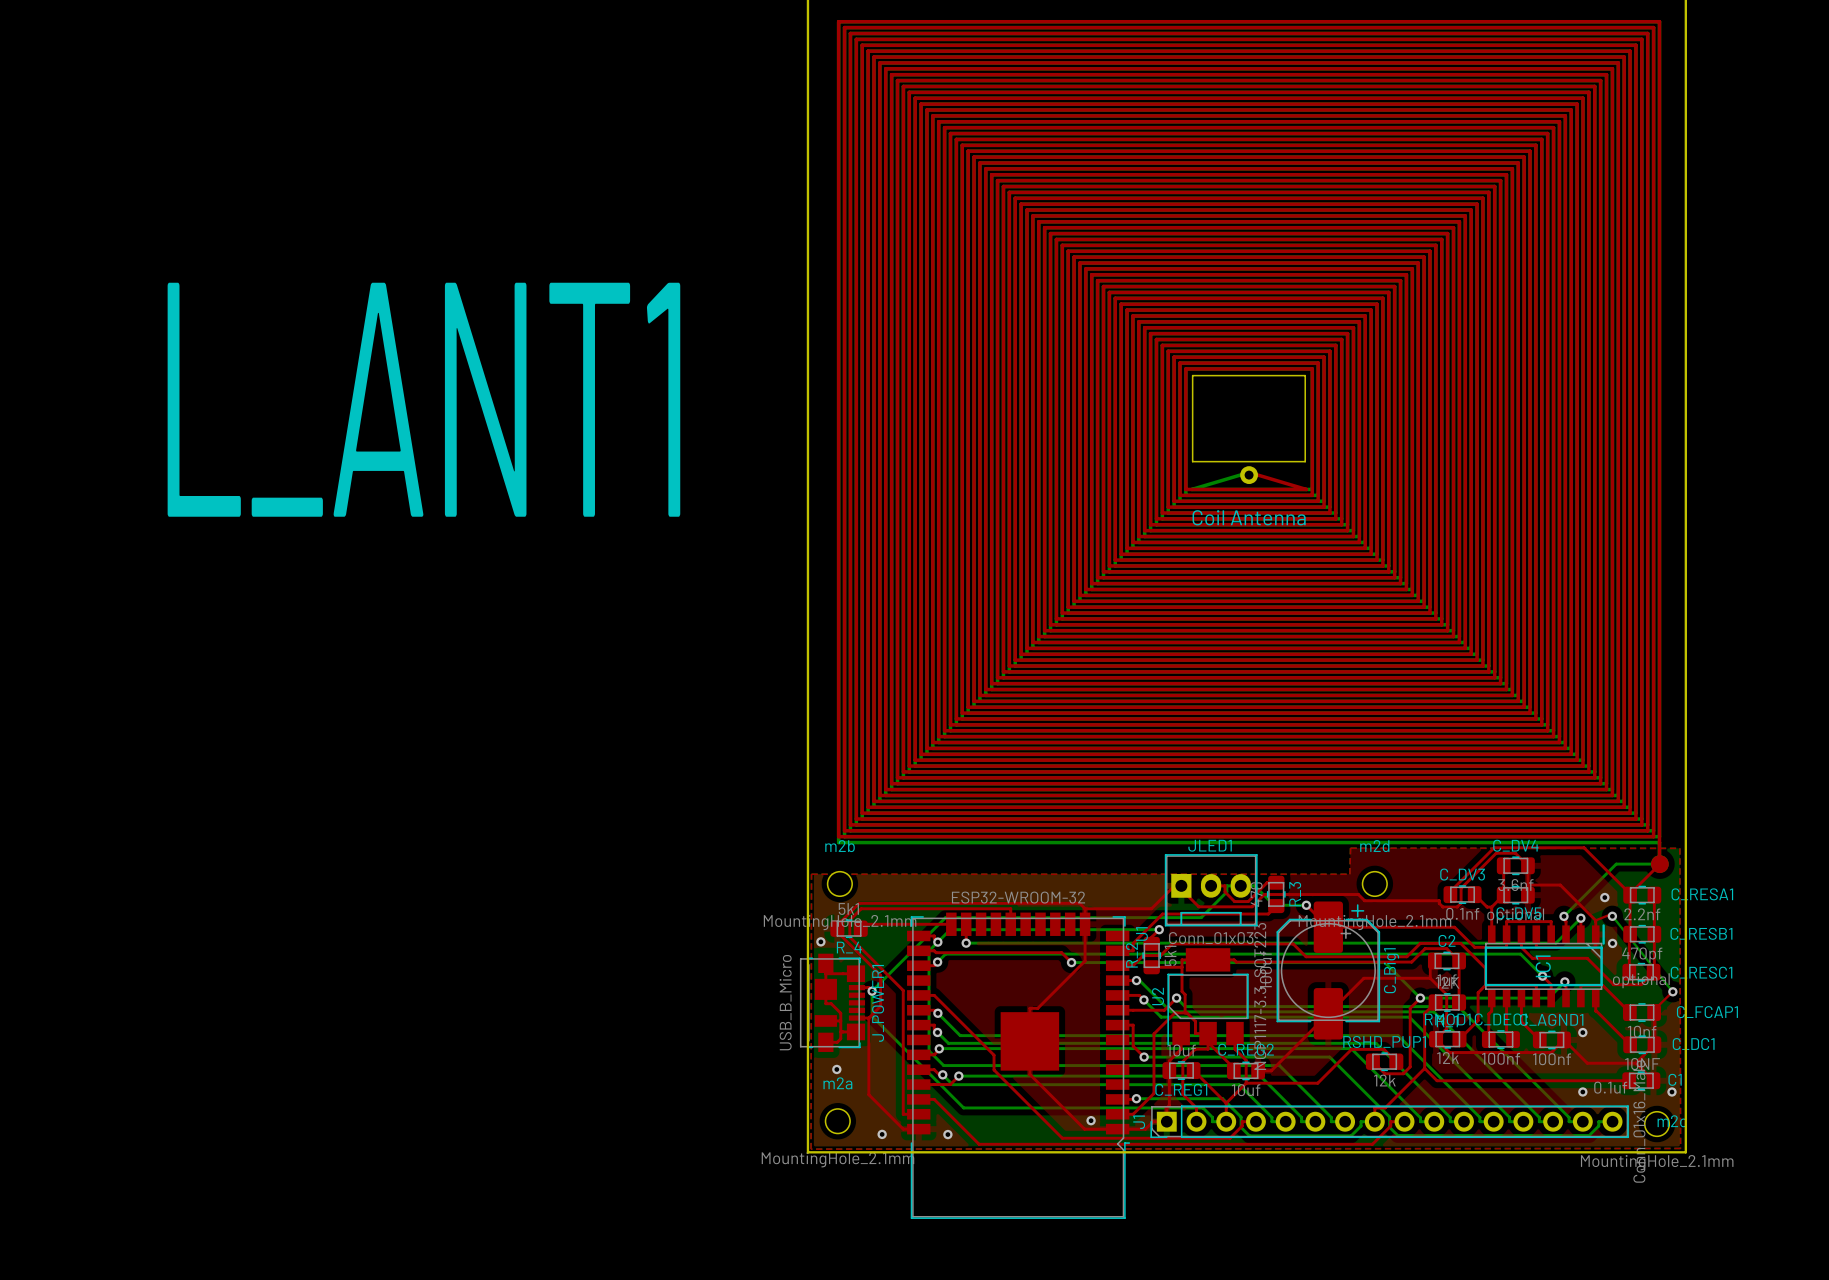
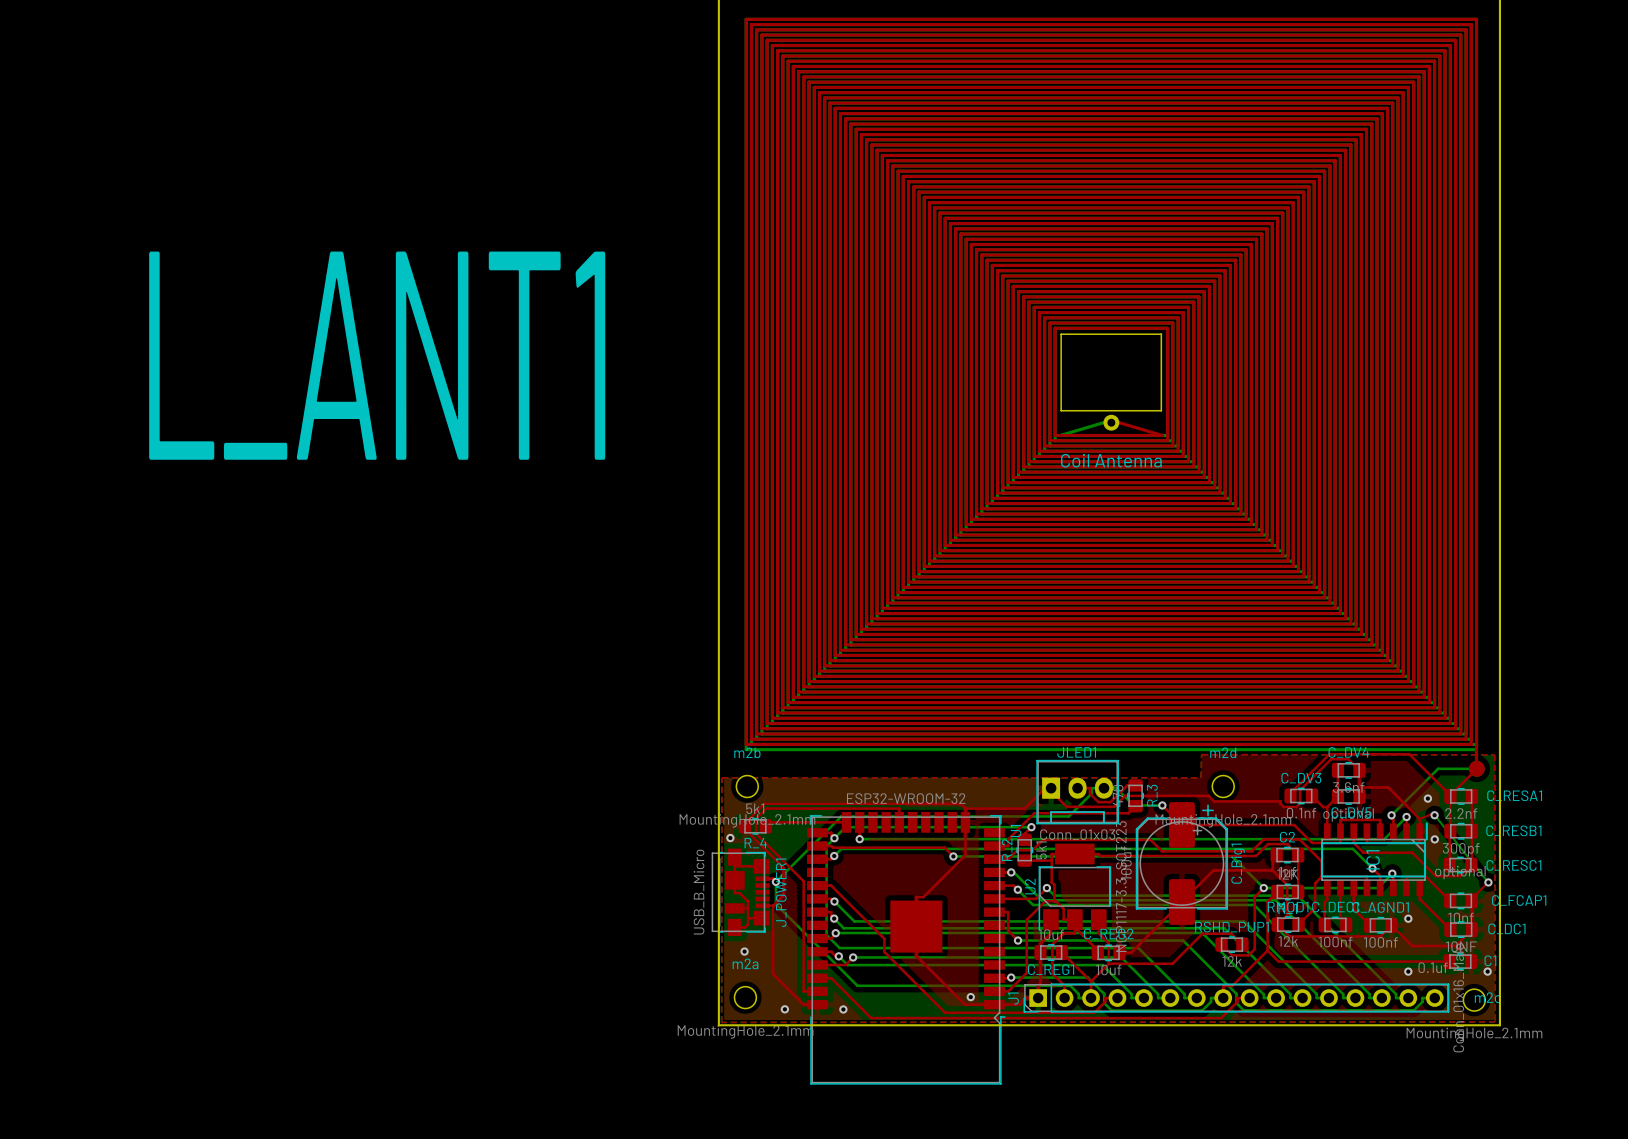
C_RESB1 value: 470pf (1642, 955) -> 300pf (1461, 849)

